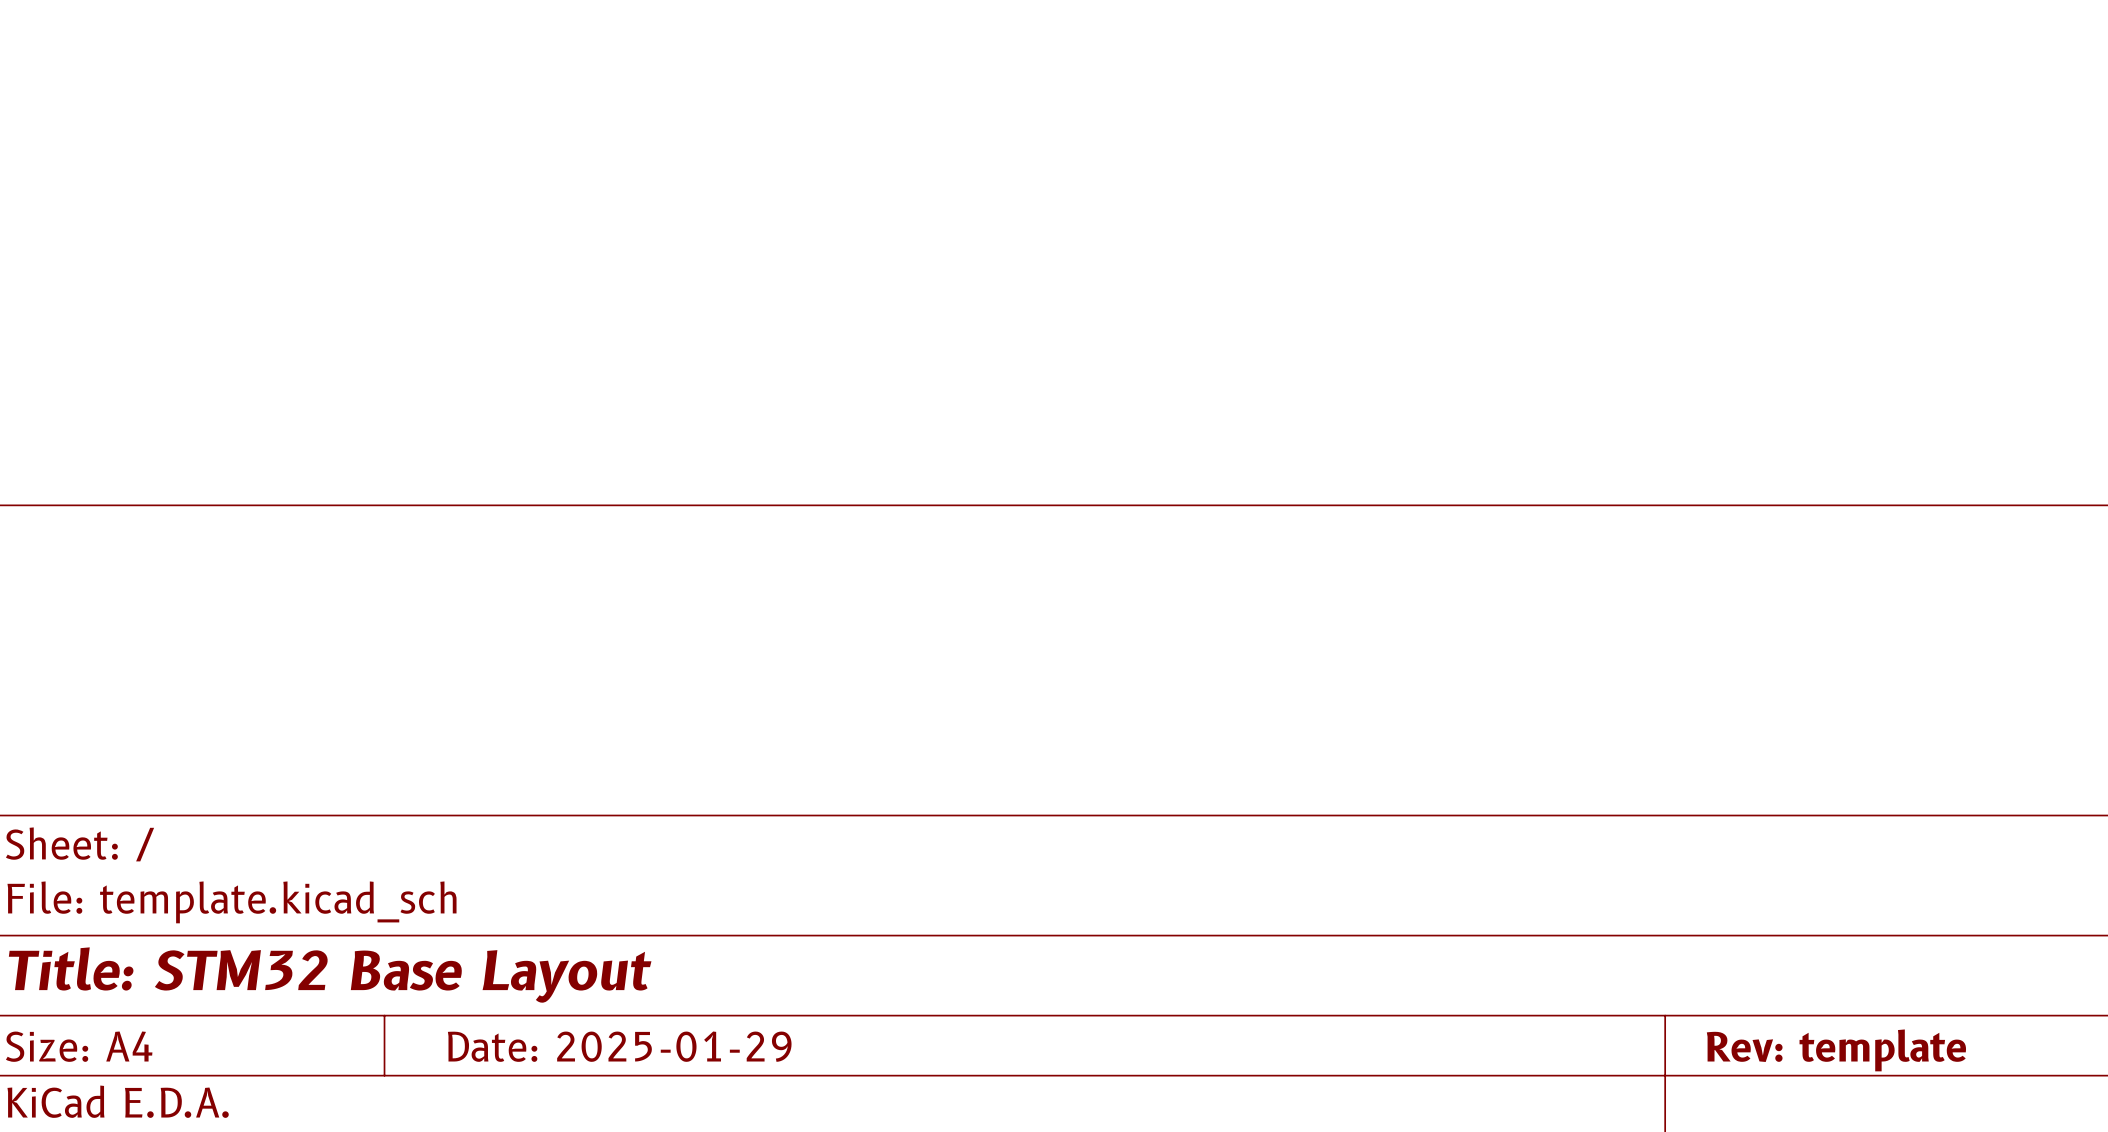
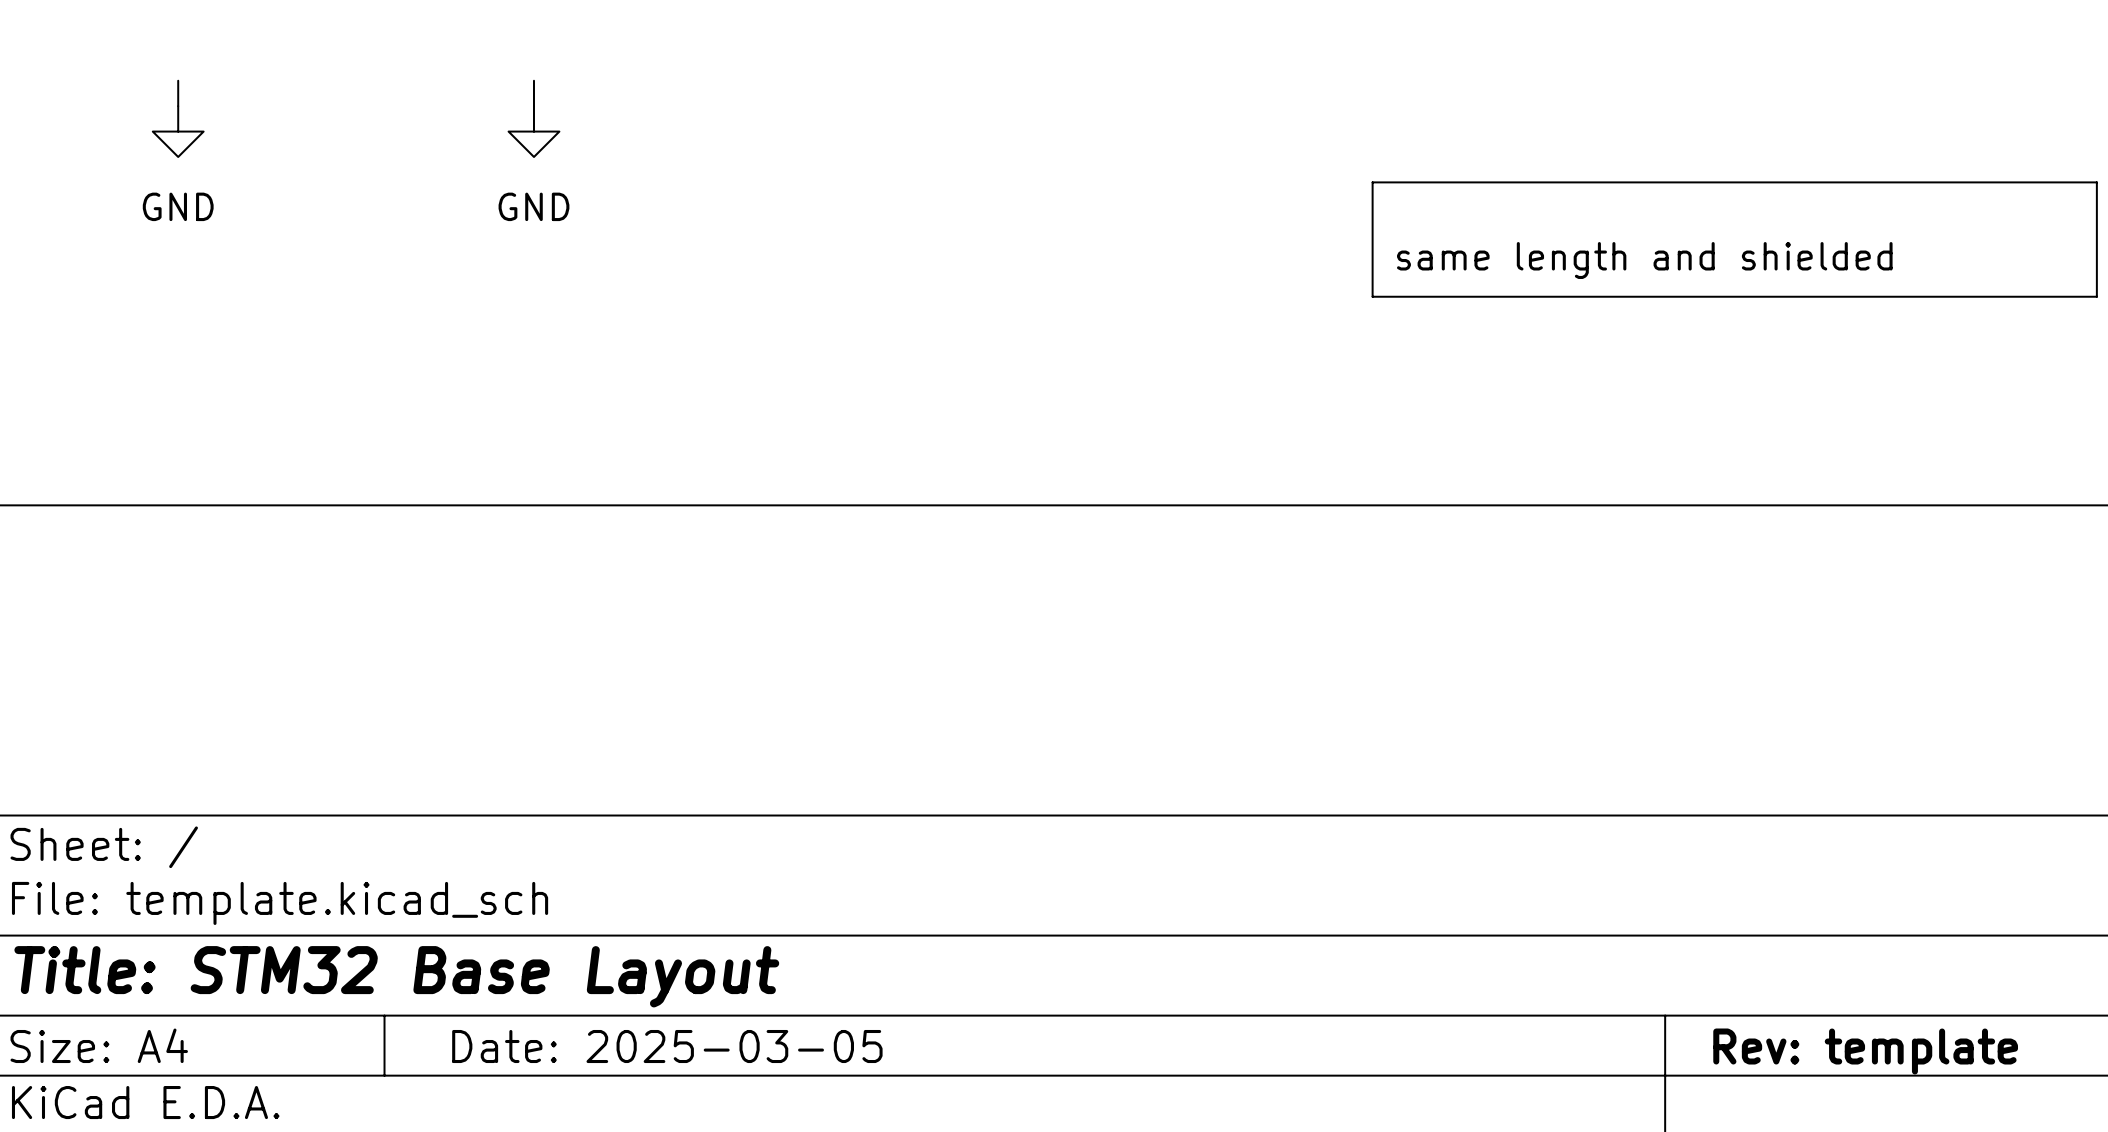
wire: none -> (178, 80) (178, 106)
wire: none -> (533, 80) (533, 106)
power symbol: none -> GND (178, 131)
power symbol: none -> GND (533, 131)
line: none -> (1372, 182) (2096, 182) (2096, 296) (1372, 296) (1372, 182)
text: none -> same length and shielded (1644, 260)
title block: Date: 2025-01-29 (619, 1046) -> Date: 2025-03-05 (667, 1046)

